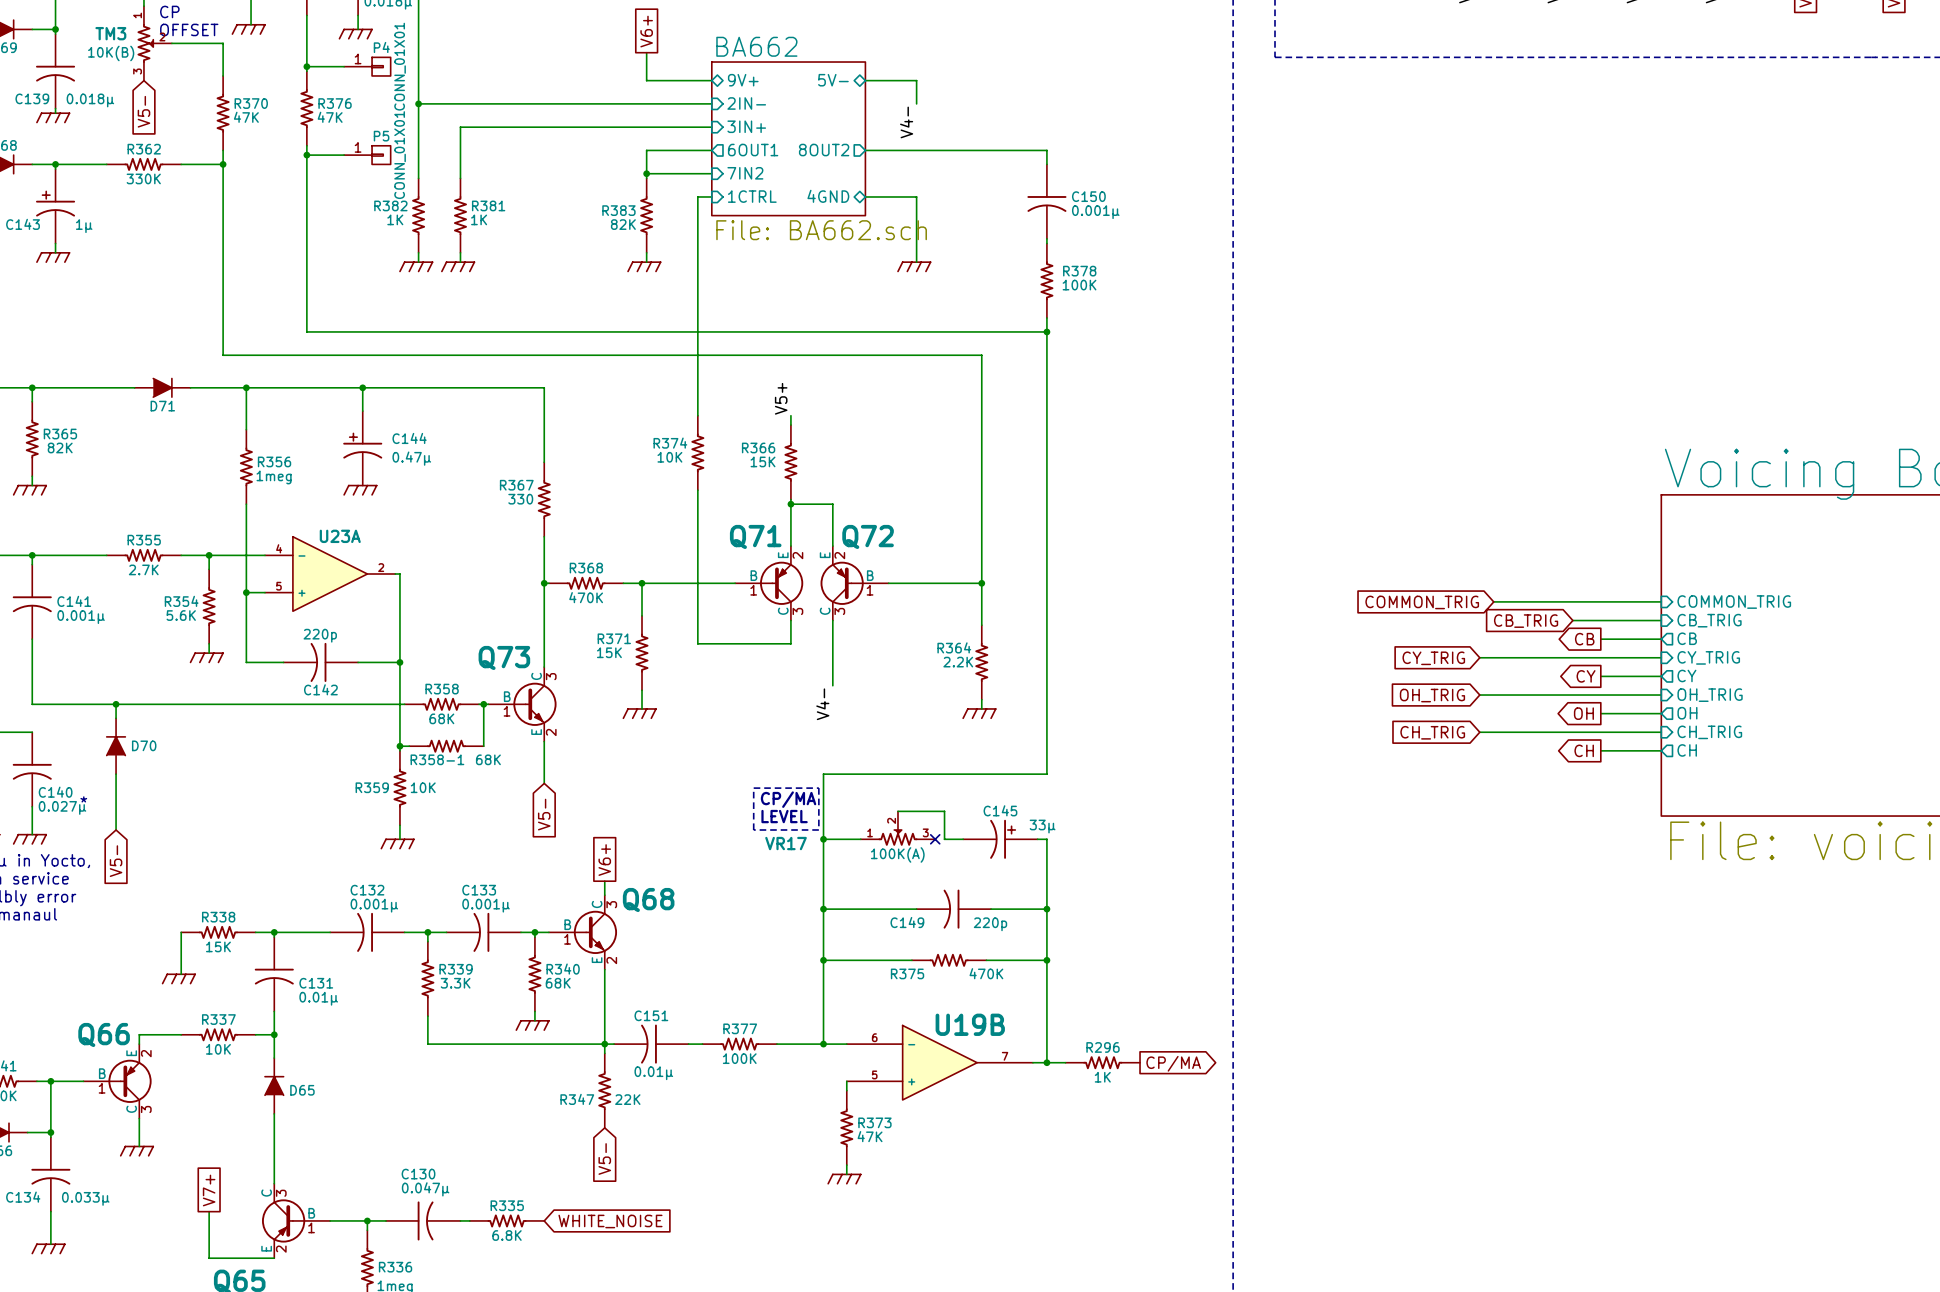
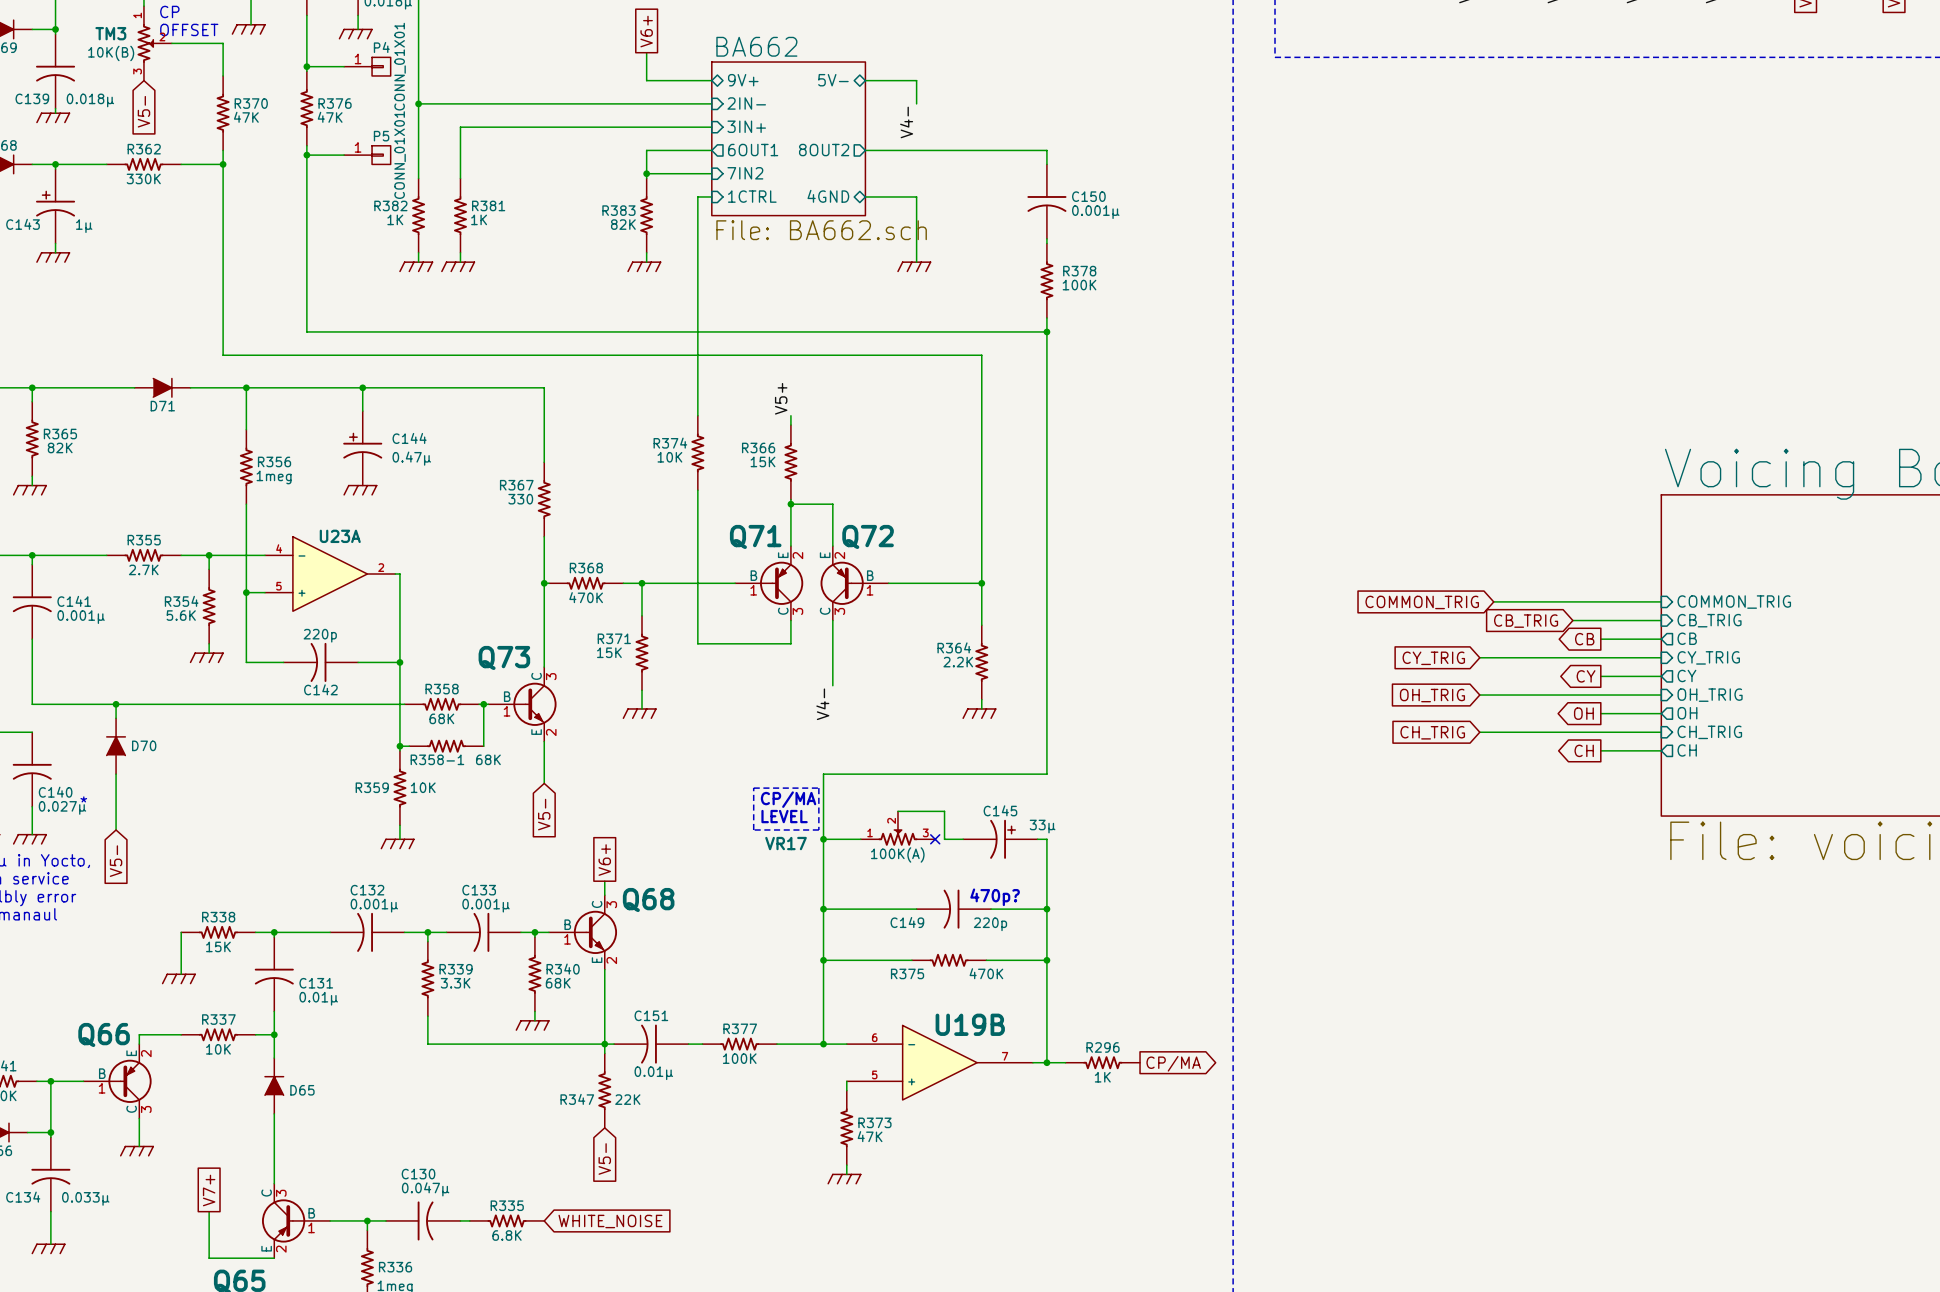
text: none -> 470p? (995, 897)

